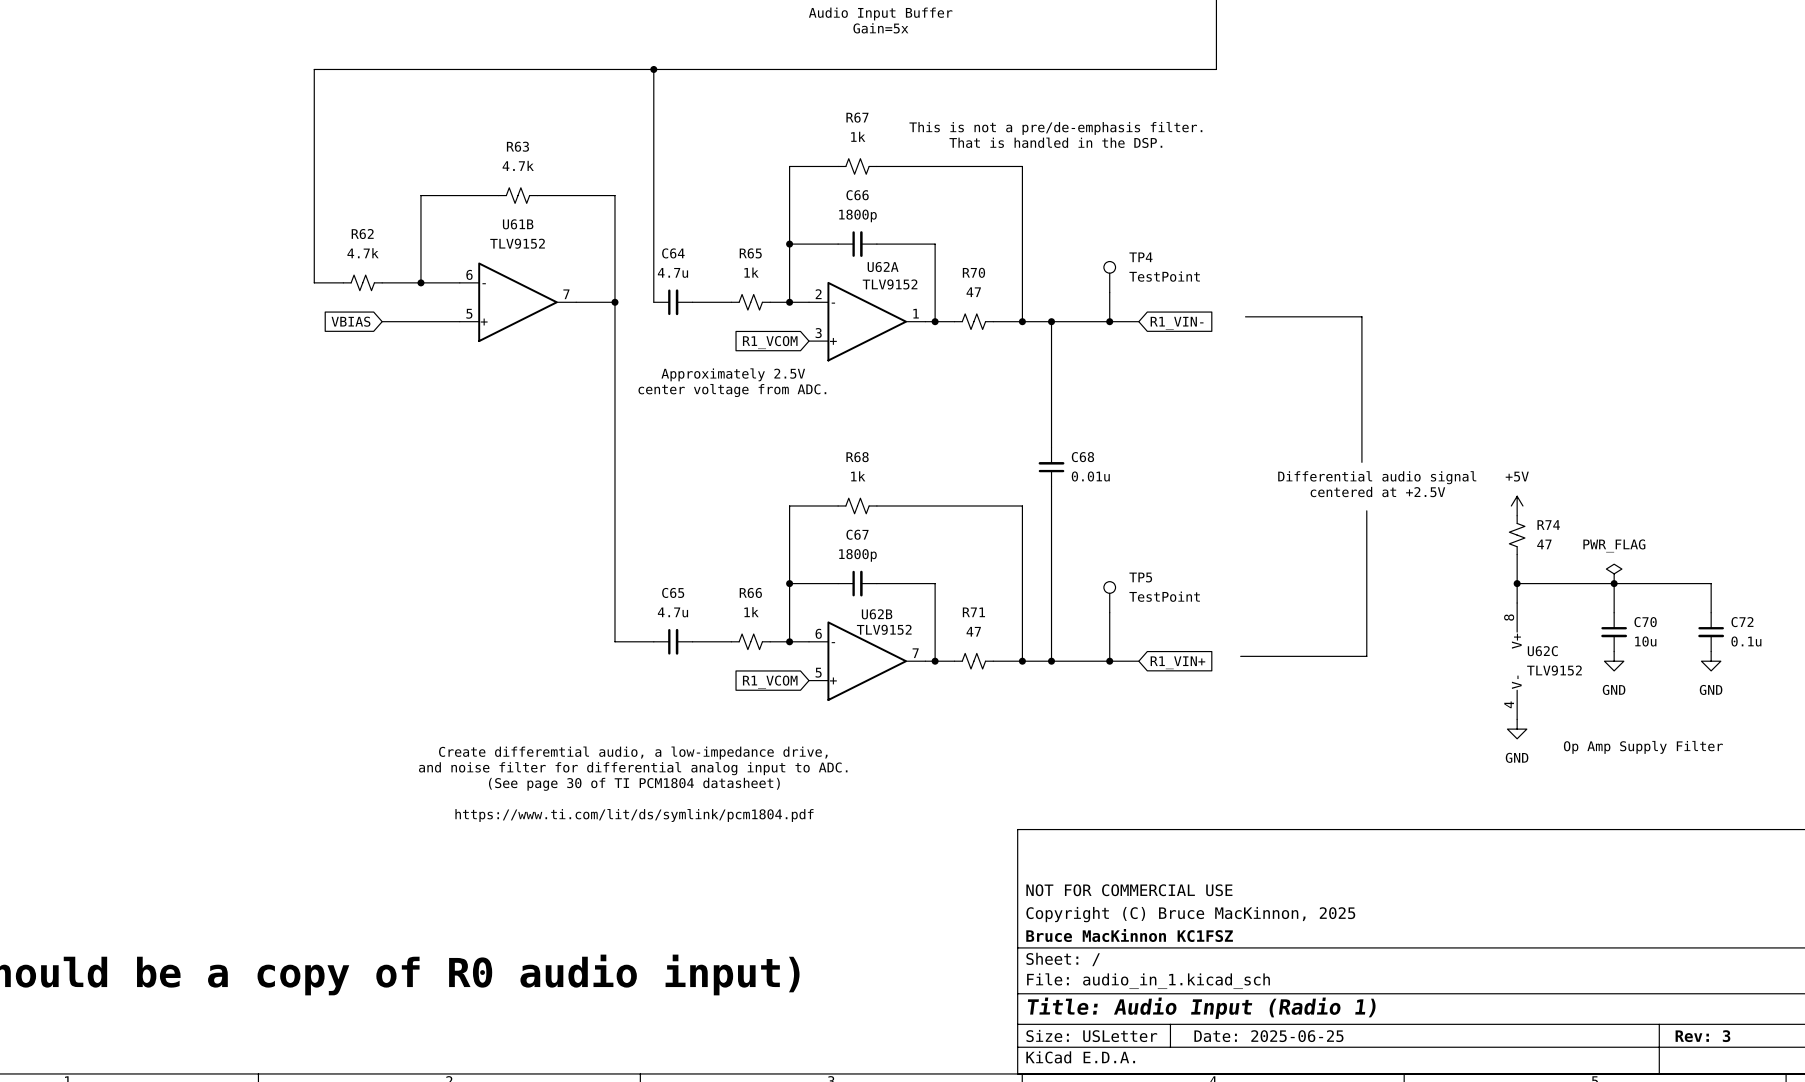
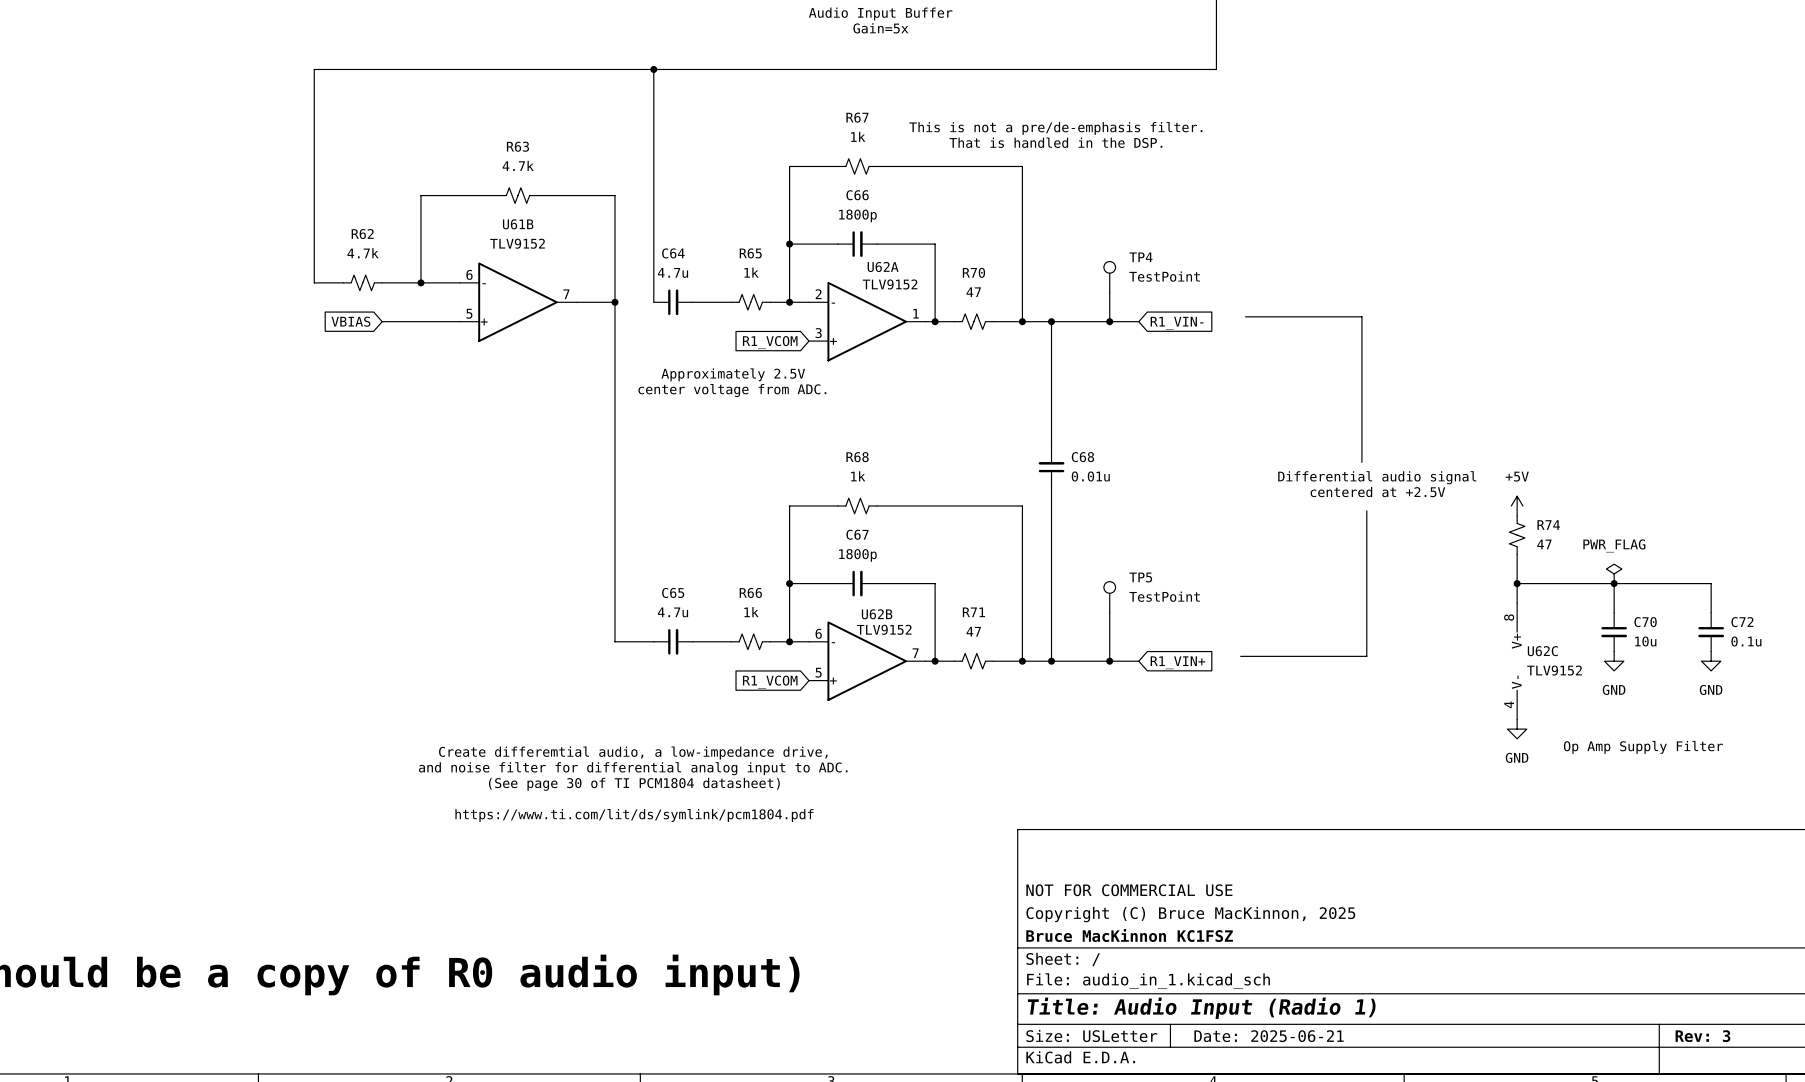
title block: Date: 2025-06-25 (1268, 1036) -> Date: 2025-06-21 (1269, 1036)

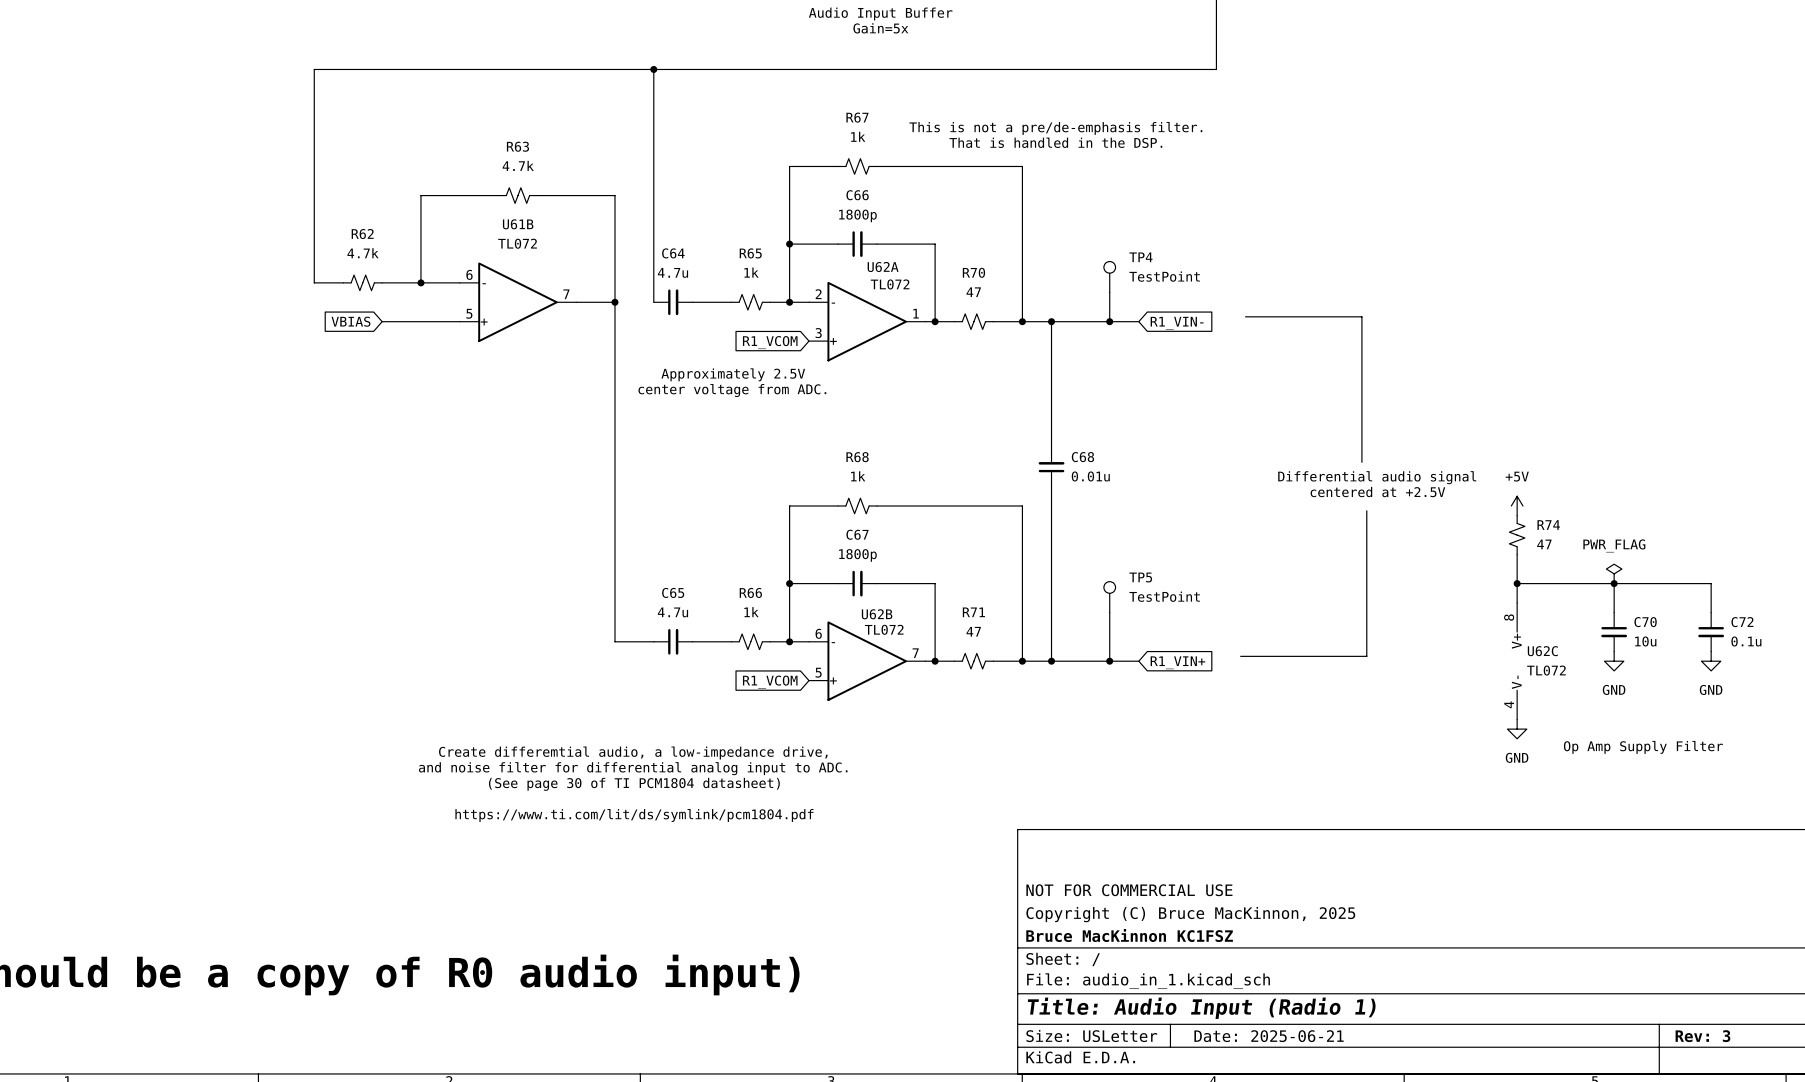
U61B value: TLV9152 (517, 243) -> TL072 (517, 243)
U62A value: TLV9152 (890, 284) -> TL072 (890, 284)
U62B value: TLV9152 (884, 629) -> TL072 (884, 629)
U62C value: TLV9152 (1554, 670) -> TL072 (1546, 670)

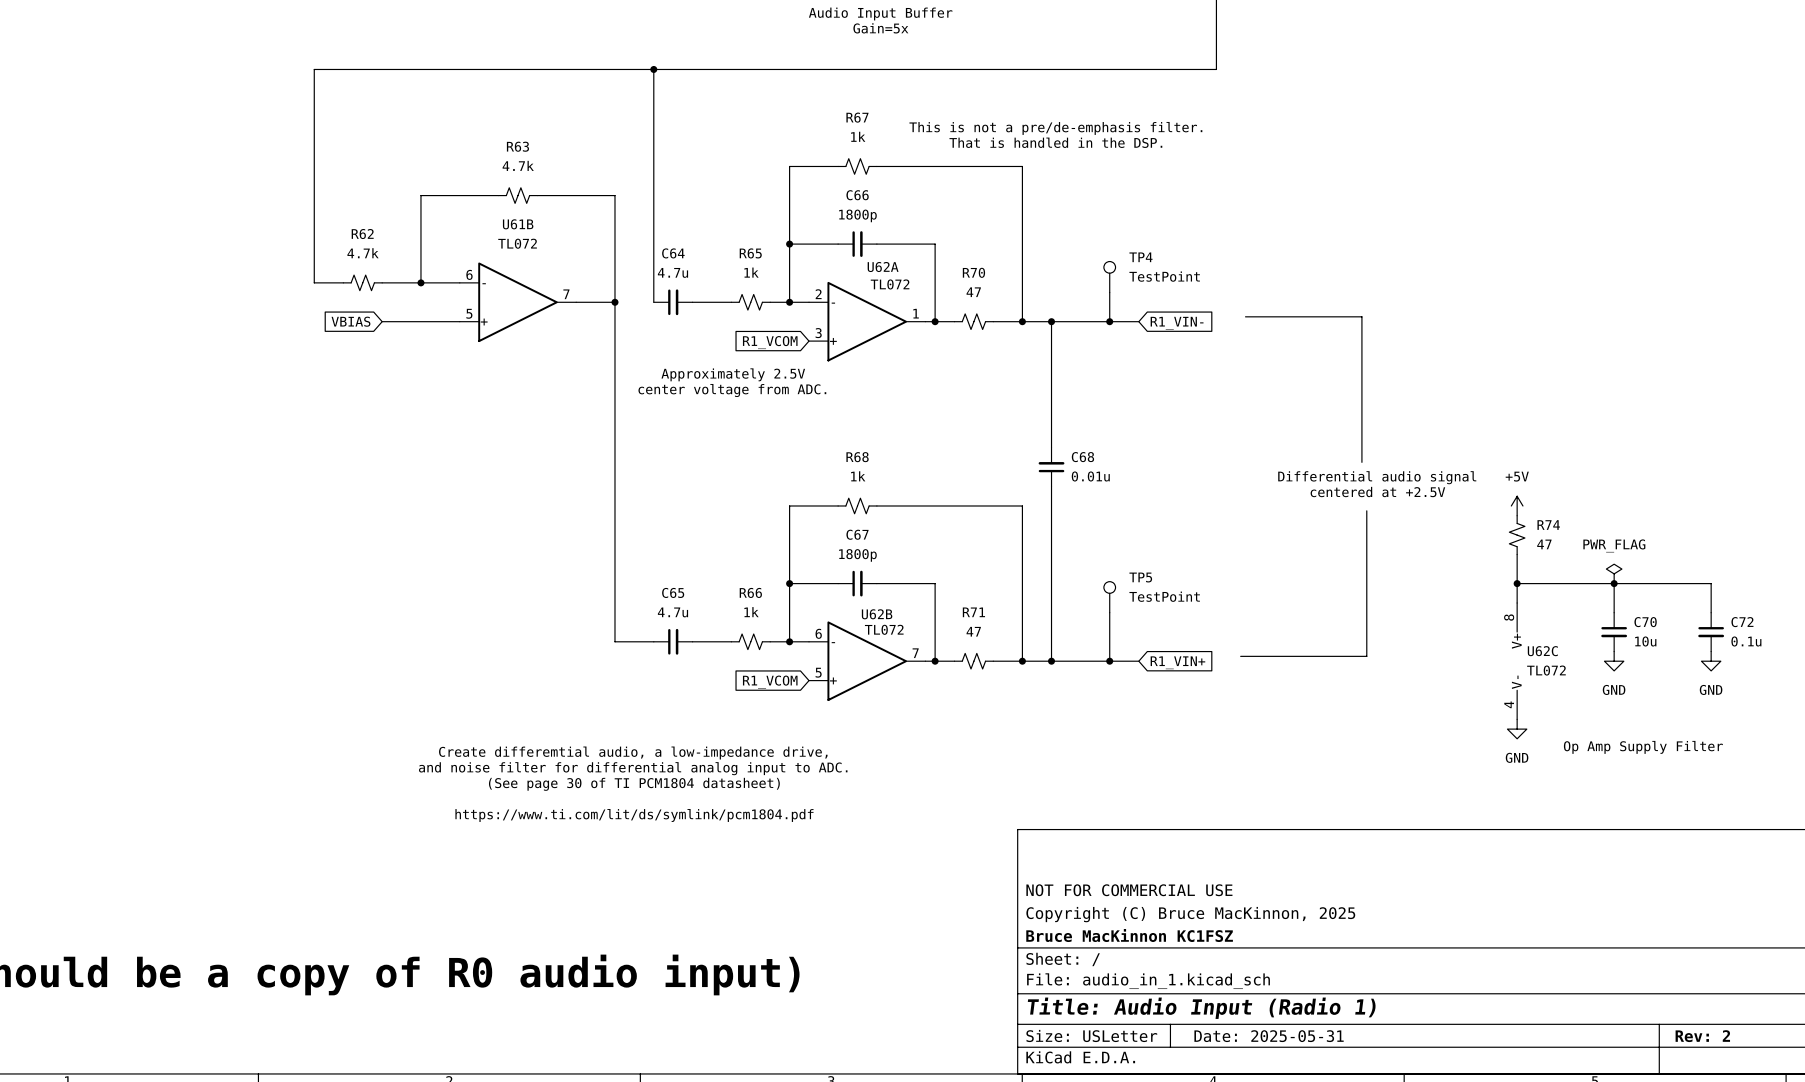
title block: Date: 2025-06-21 (1269, 1036) -> Date: 2025-05-31 (1269, 1036)
title block: Rev: 3 (1702, 1036) -> Rev: 2 (1702, 1036)

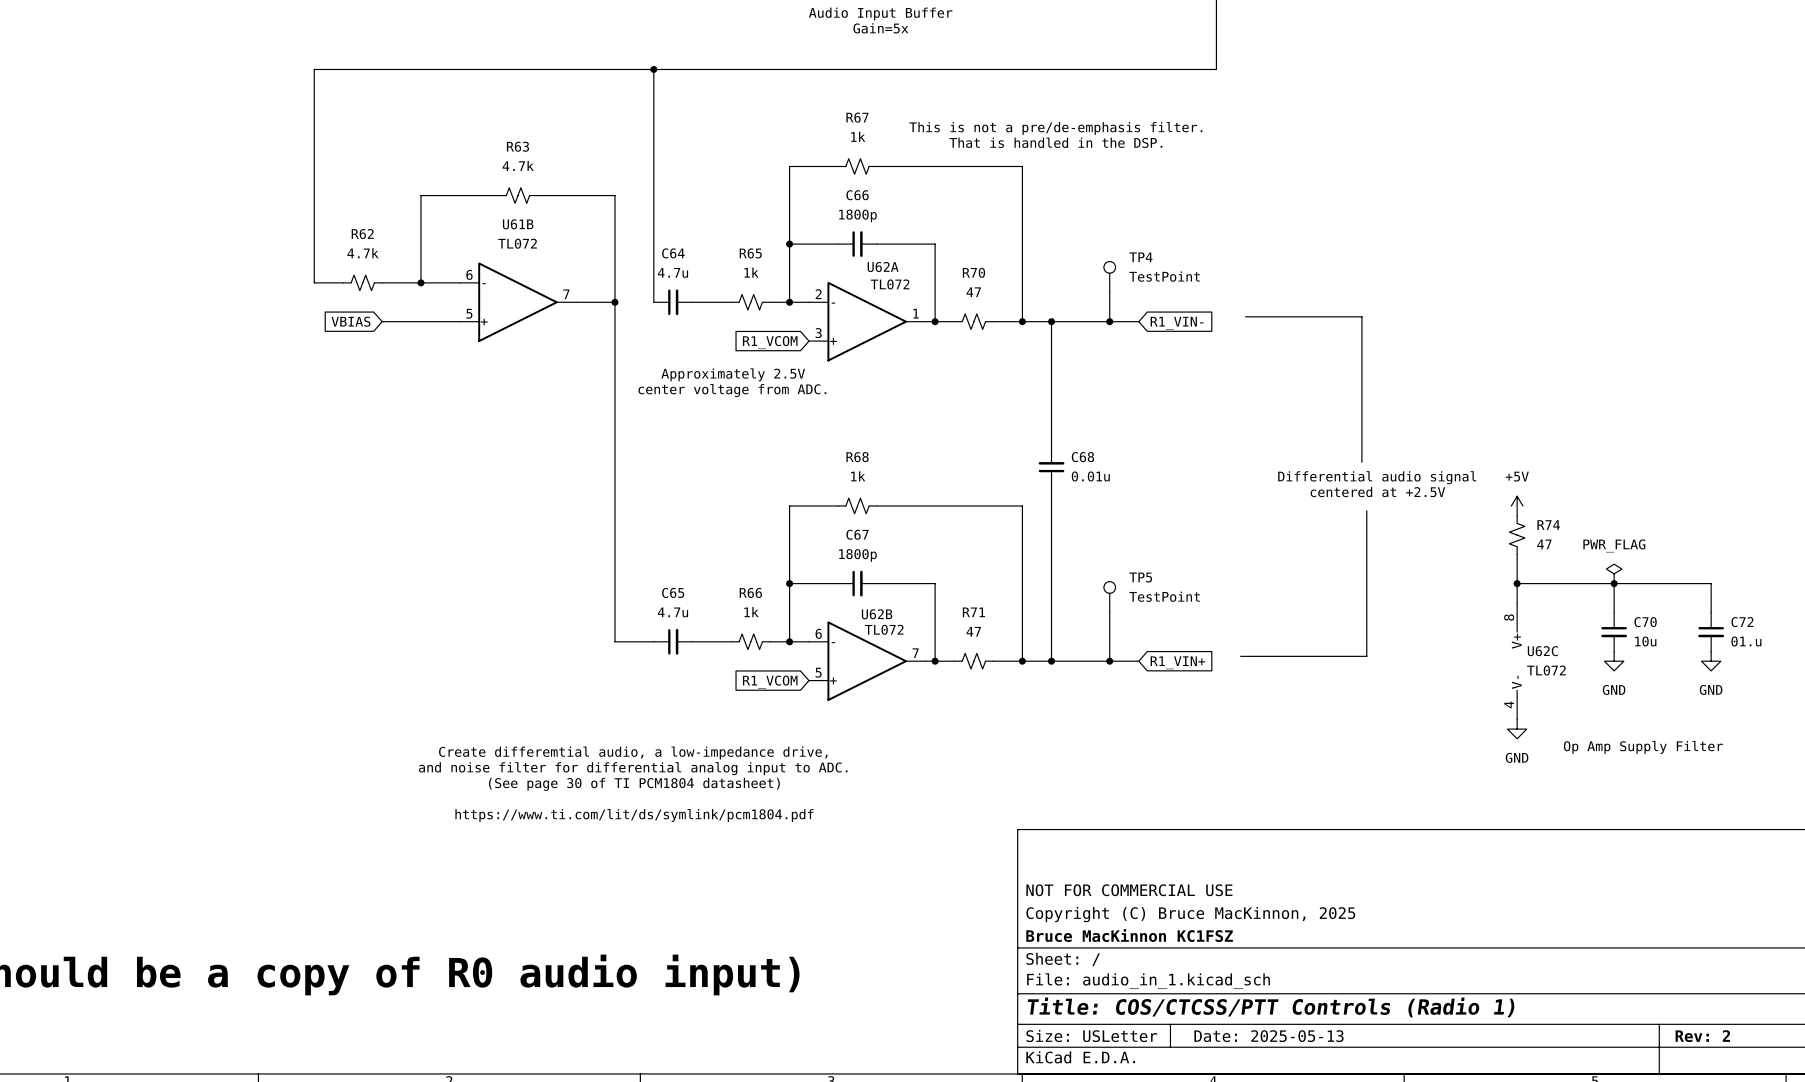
C72 value: 0.1u (1746, 641) -> 01.u (1746, 641)
title block: Title: Audio Input (Radio 1) (1201, 1008) -> Title: COS/CTCSS/PTT Controls (Radio 1) (1271, 1007)
title block: Date: 2025-05-31 (1269, 1036) -> Date: 2025-05-13 (1268, 1036)

